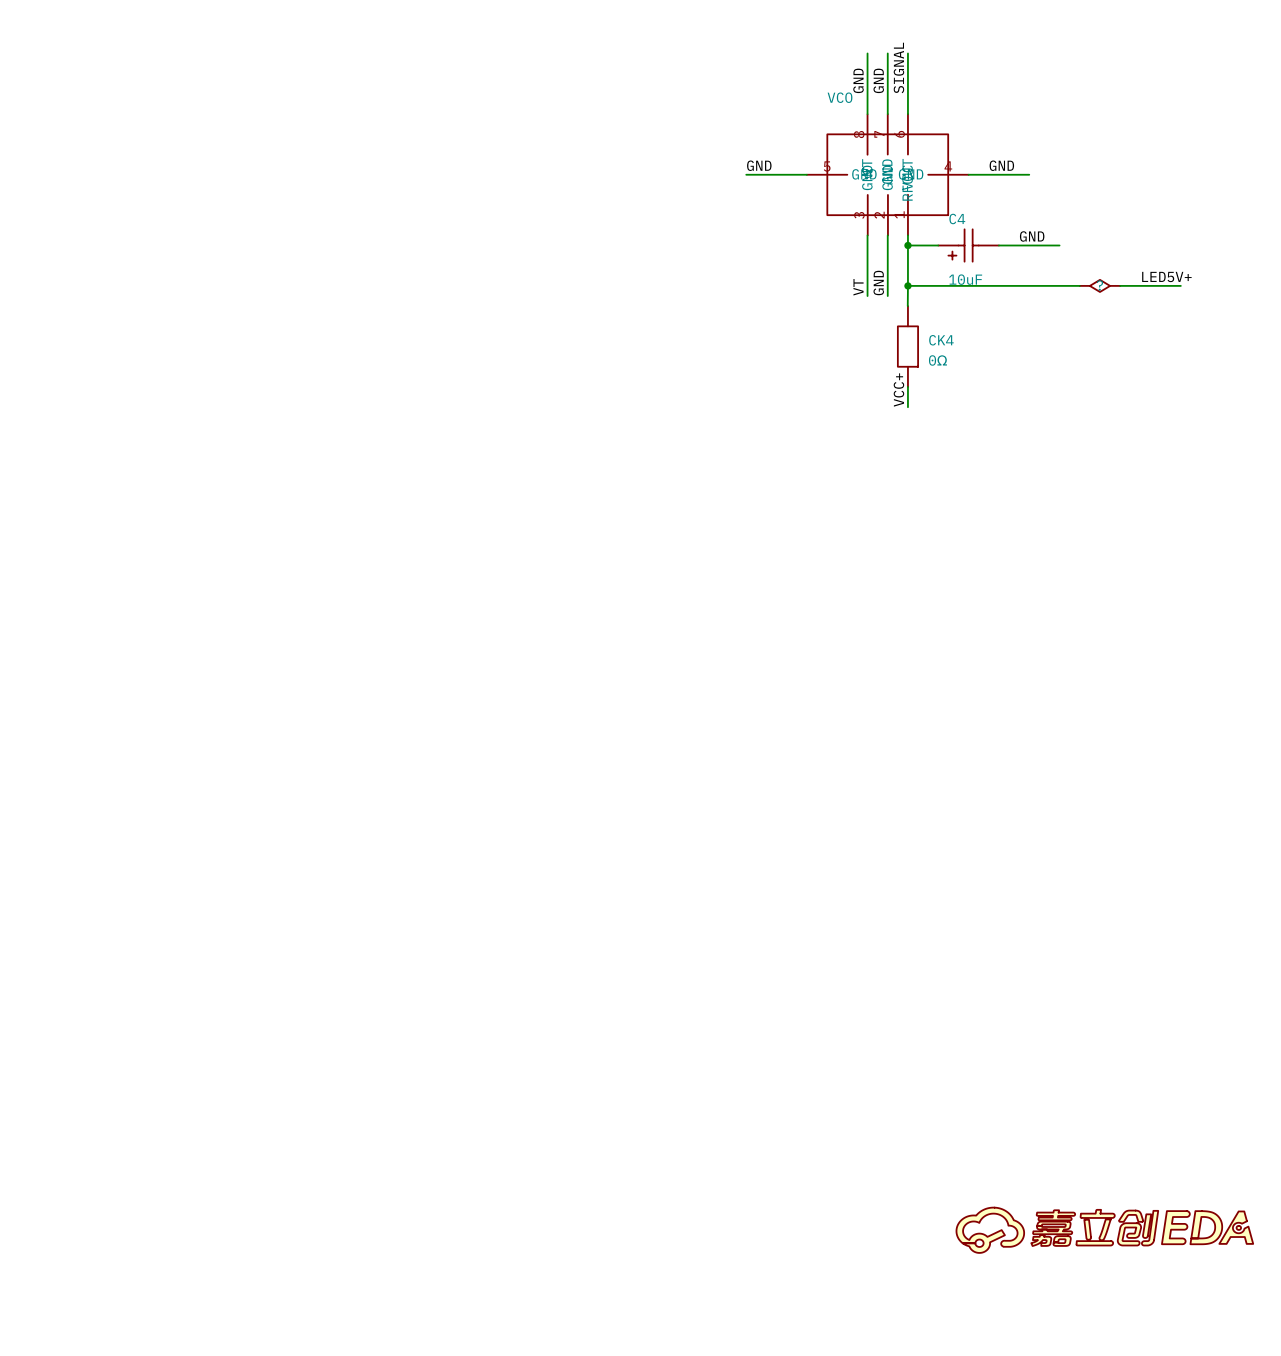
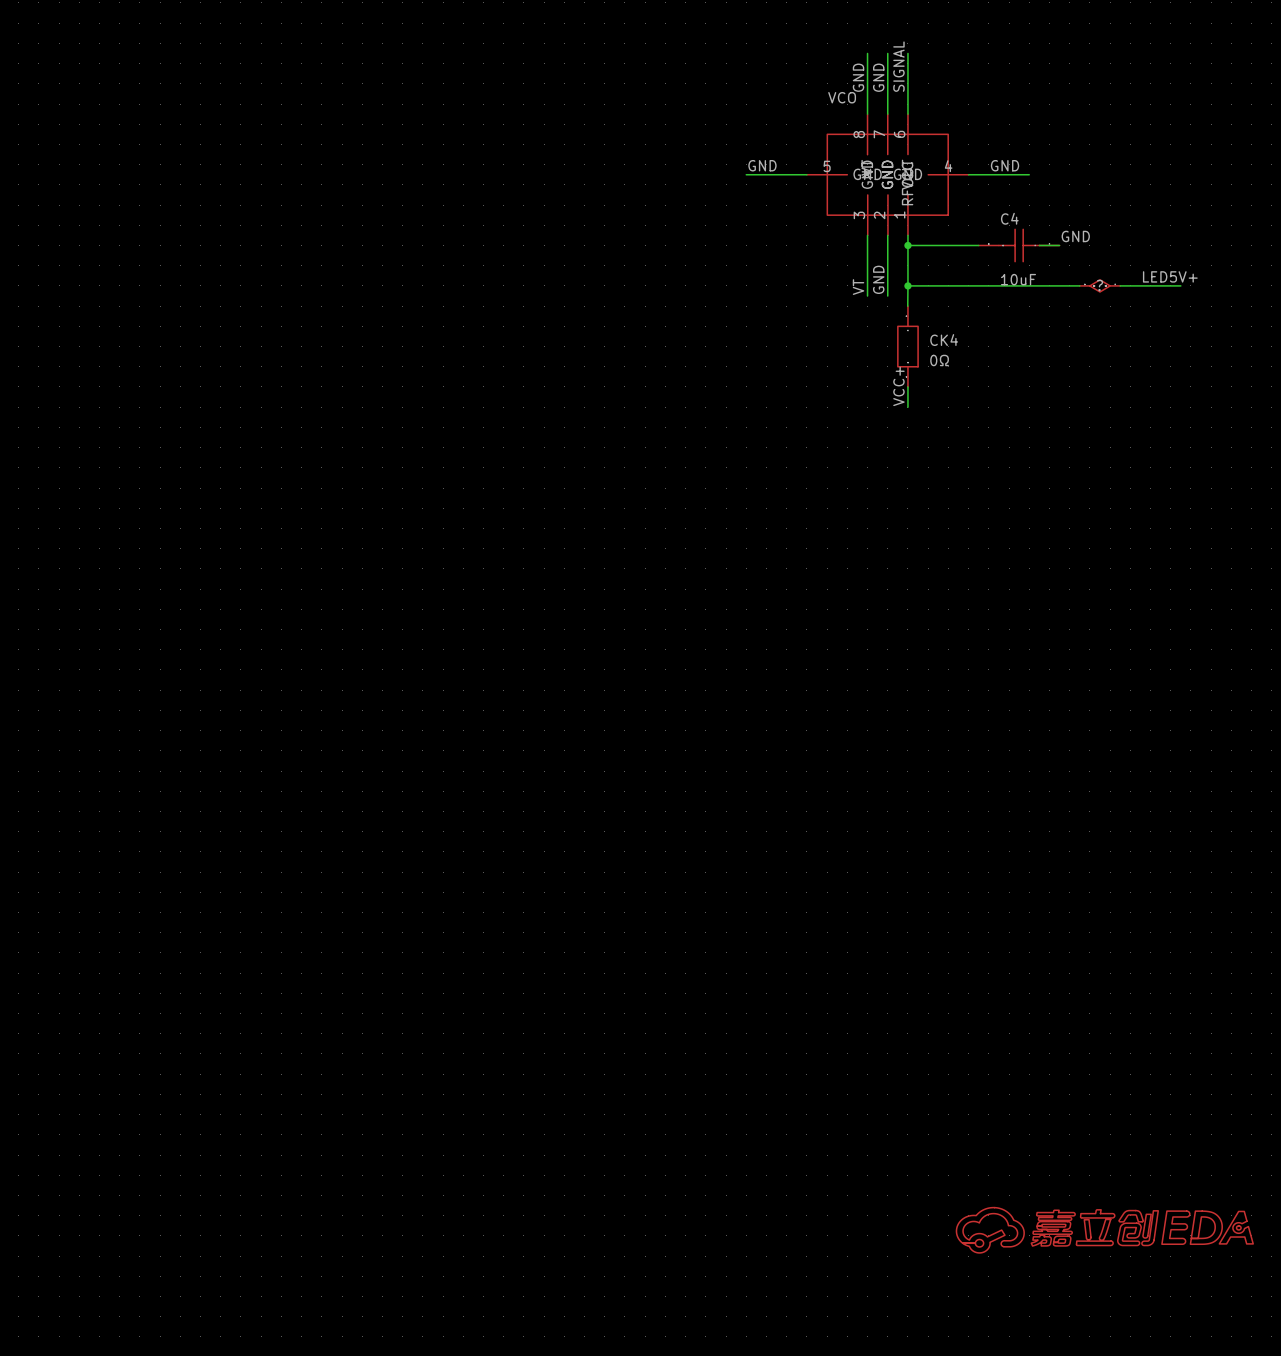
C4 symbol: [938, 229, 999, 262] -> [978, 229, 1060, 262]
label position: GND (1032, 236) -> GND (1075, 236)

